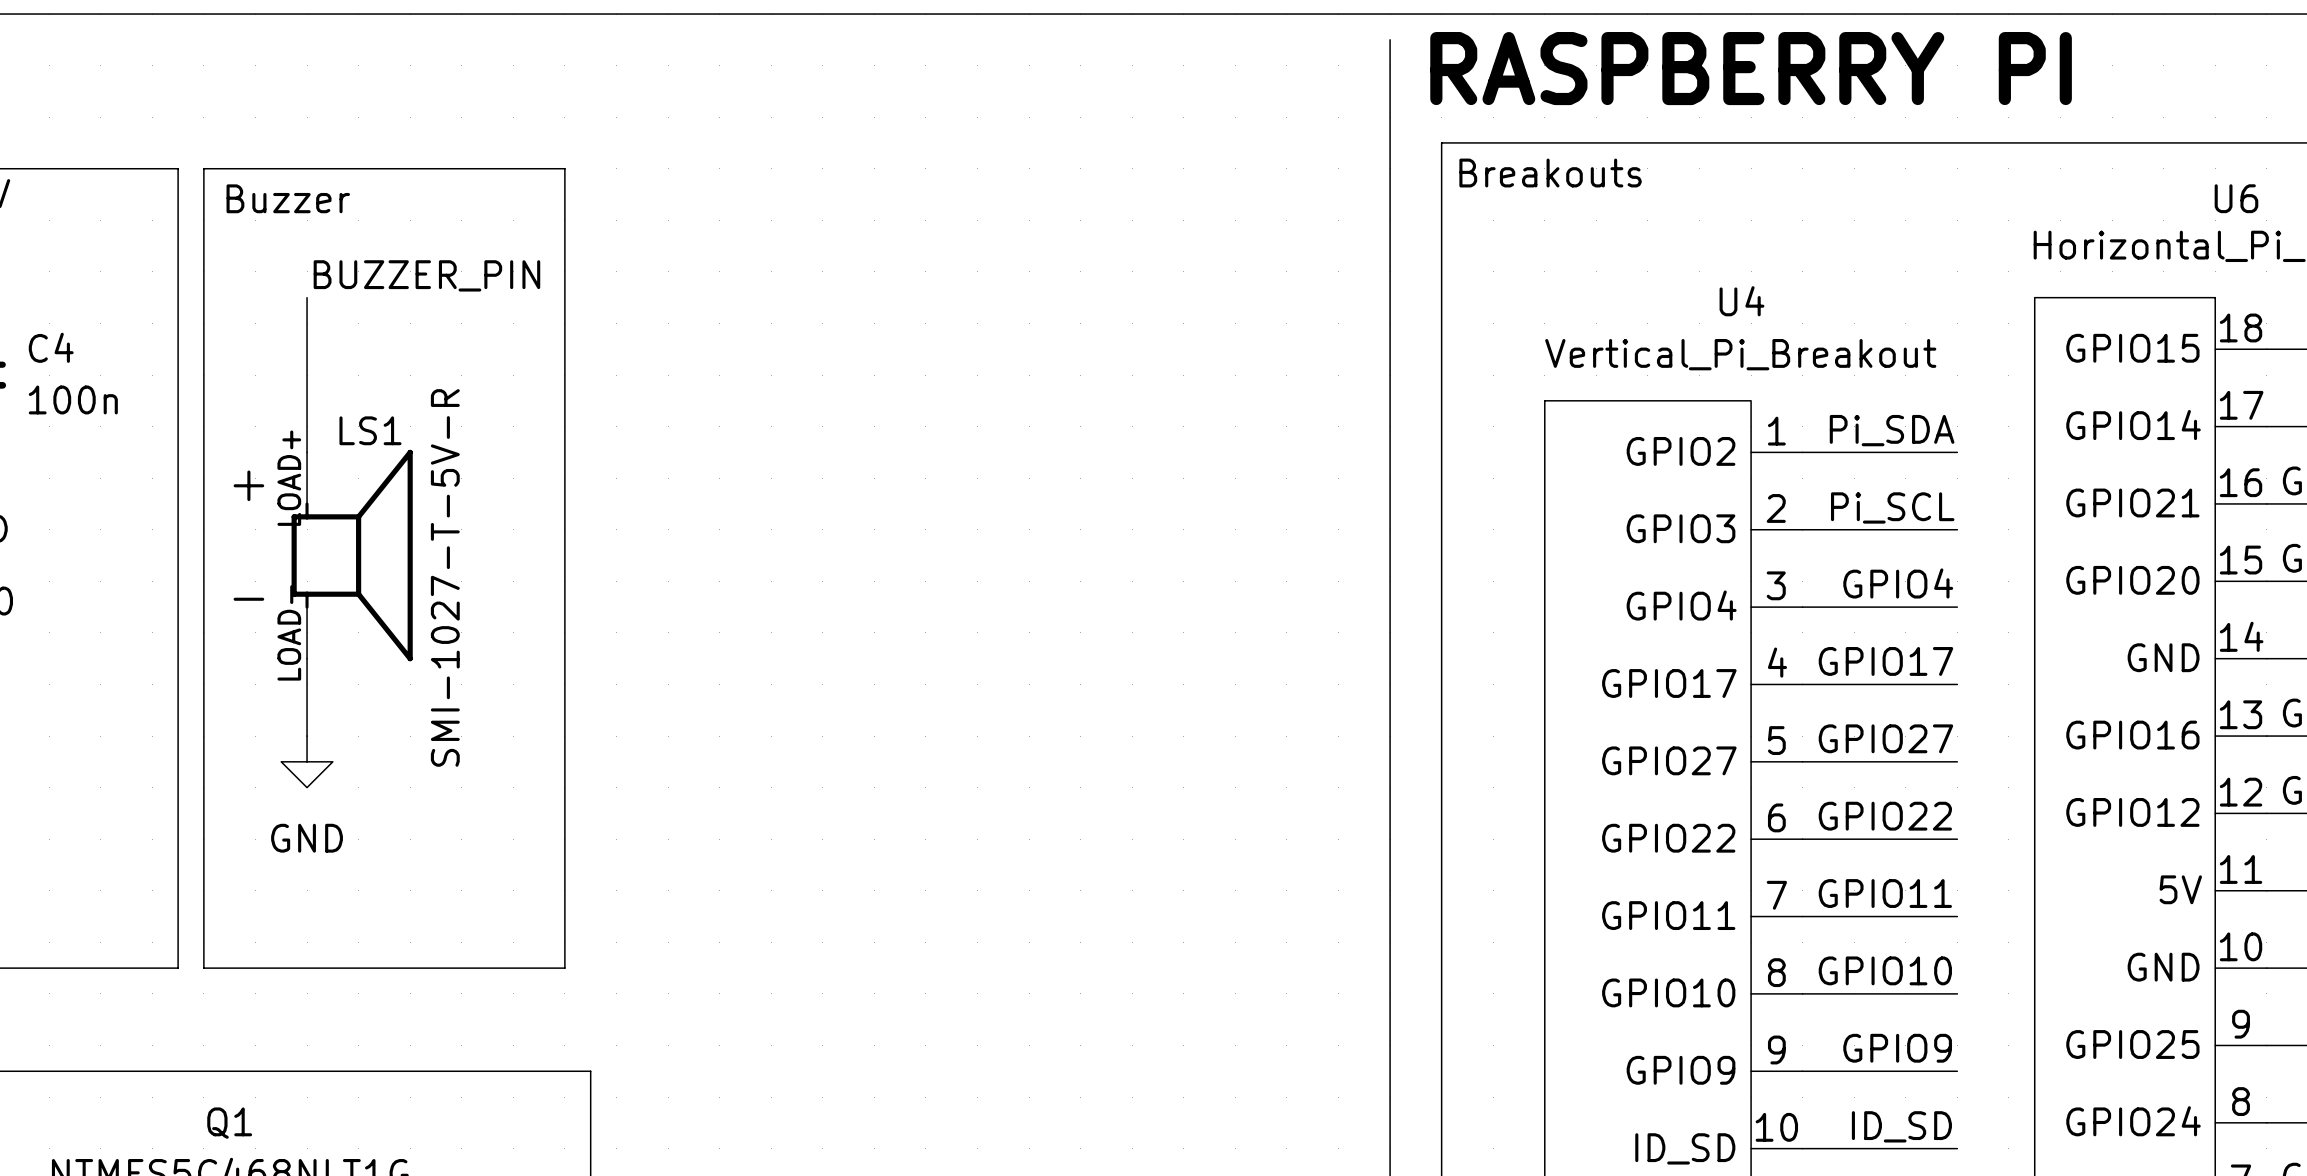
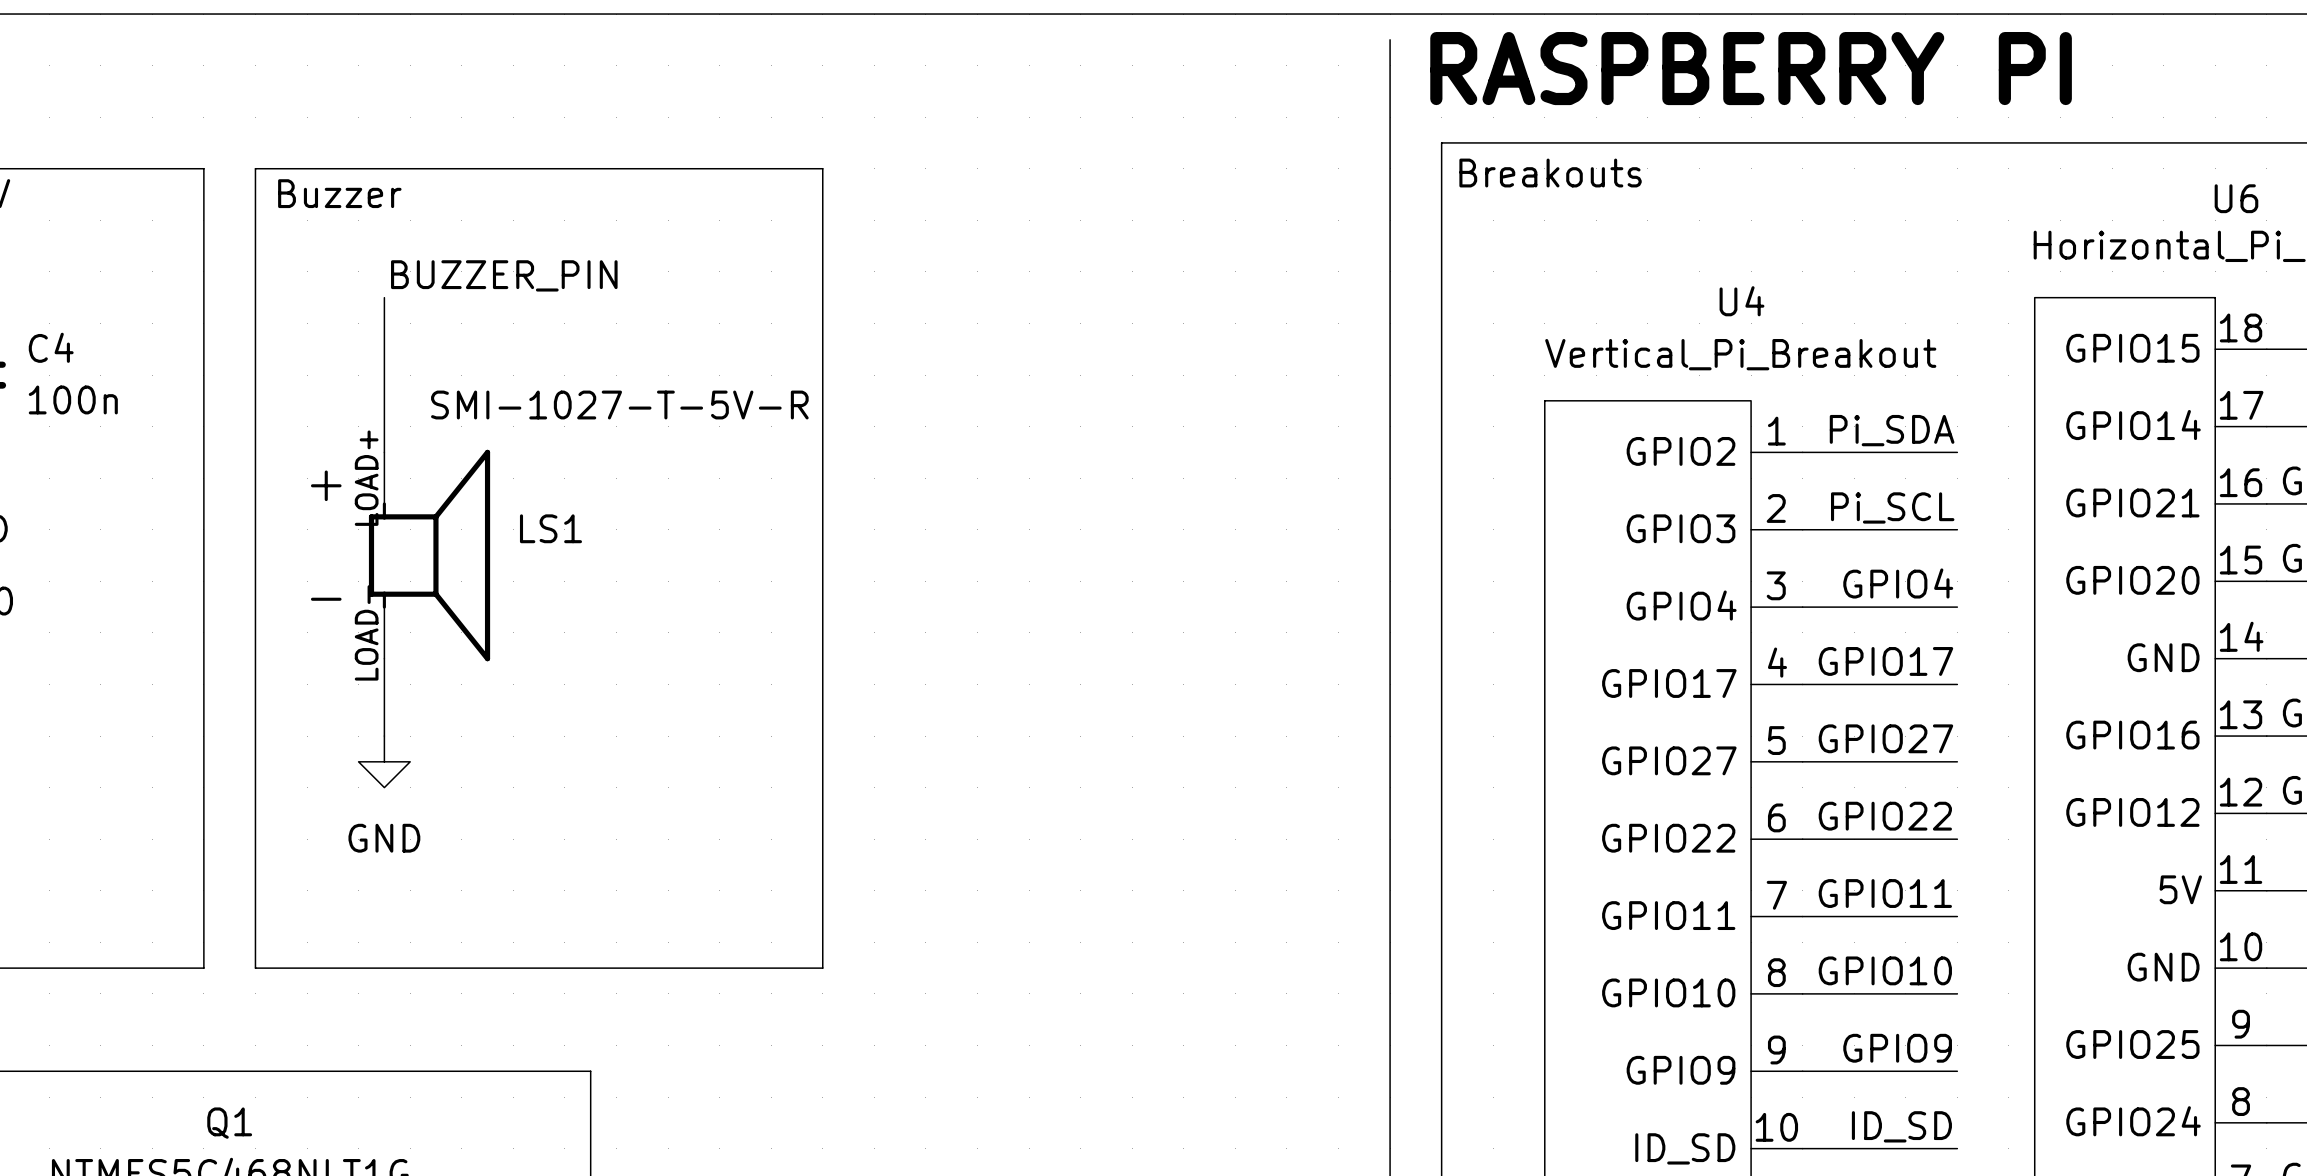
line: (178, 168) (178, 968) -> (255, 168) (255, 968)
line: (203, 168) (255, 168) -> (203, 168) (178, 168)
line: (564, 168) (564, 968) -> (564, 168) (822, 168) (822, 968) (564, 968)
text position: Buzzer (288, 198) -> Buzzer (339, 193)
label position: BUZZER_PIN (426, 275) -> BUZZER_PIN (504, 275)
wire: (307, 297) (307, 452) -> (384, 297) (384, 452)
LS1 name position: LS1 (370, 430) -> LS1 (550, 528)
LS1 position: (352, 555) -> (429, 555)
LS1 value rotation: 0° (445, 577) -> 90° clockwise (619, 405)
wire: (307, 658) (307, 736) -> (384, 658) (384, 736)
power symbol position: GND (307, 761) -> GND (384, 761)
line: (203, 968) (255, 968) -> (203, 968) (178, 968)

